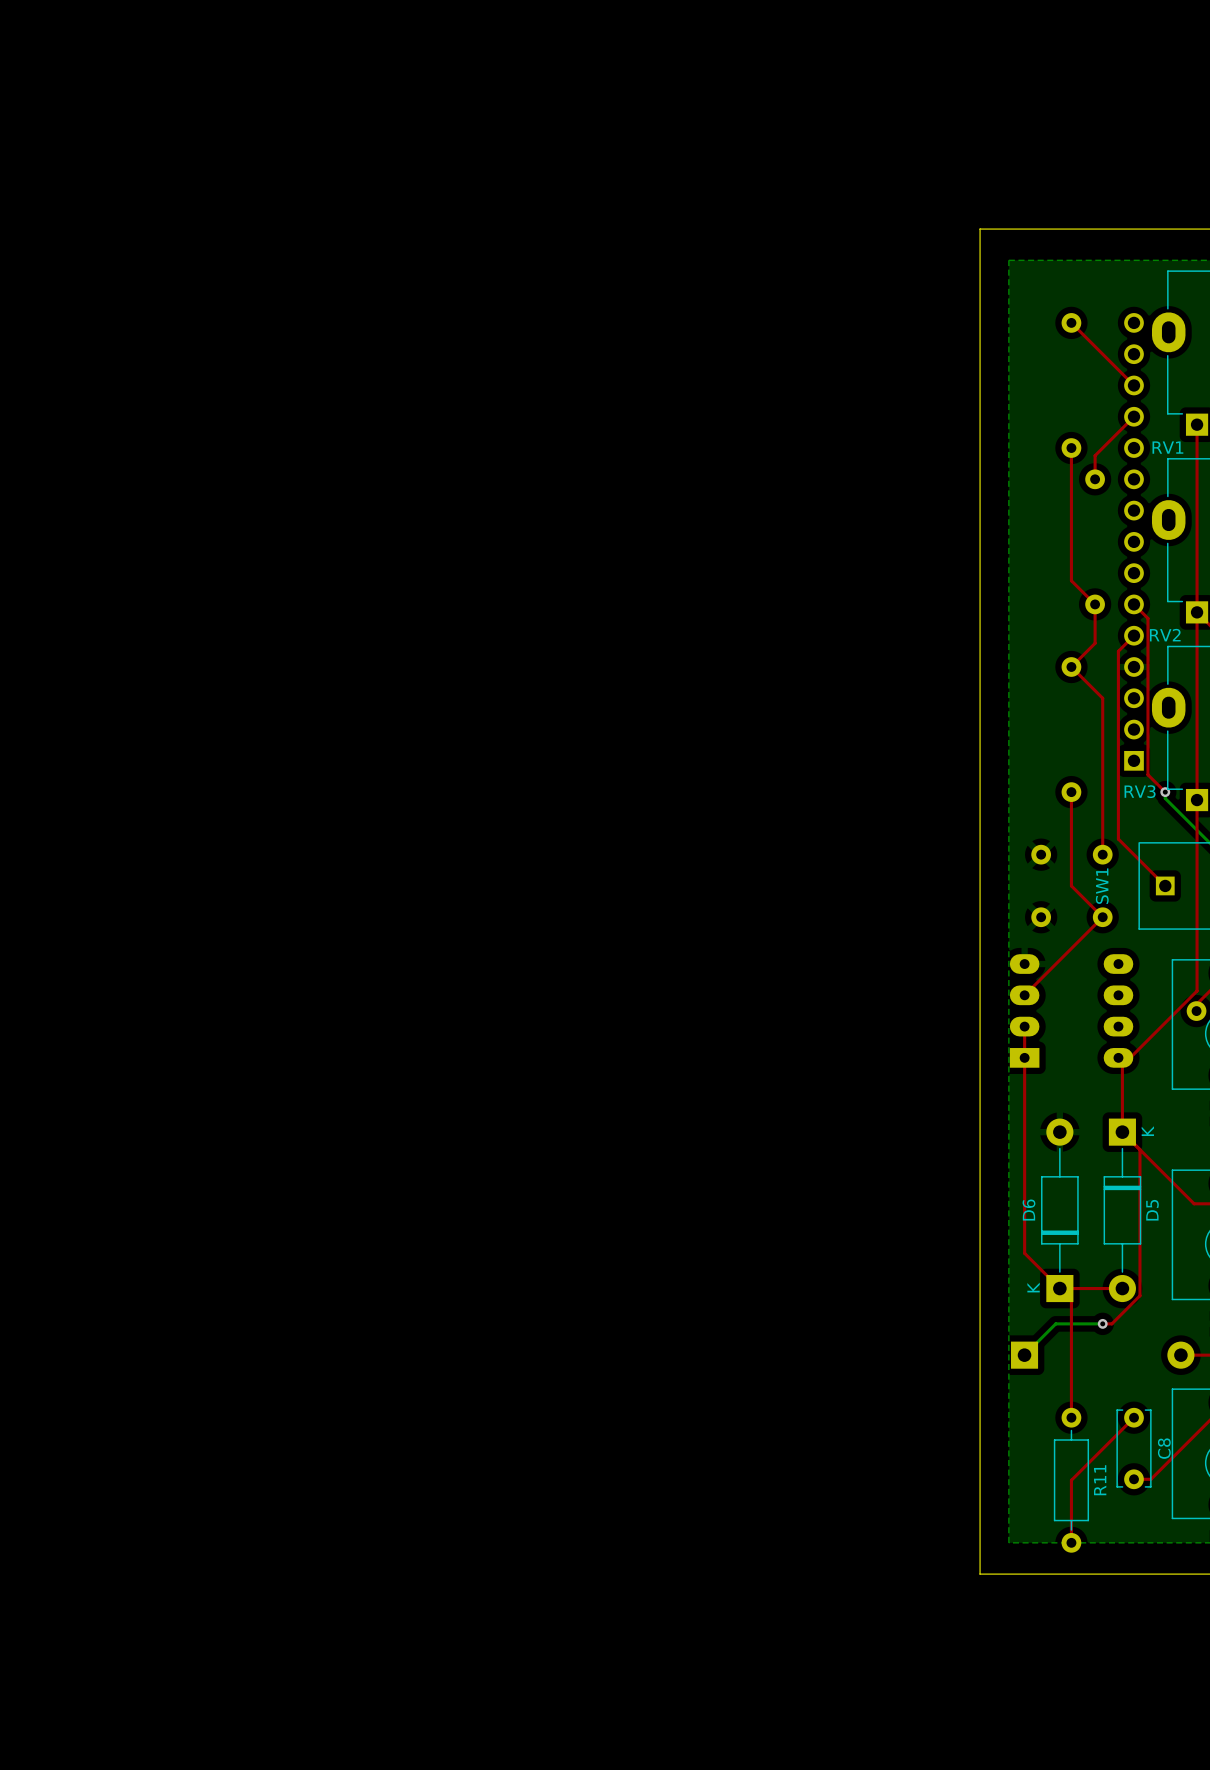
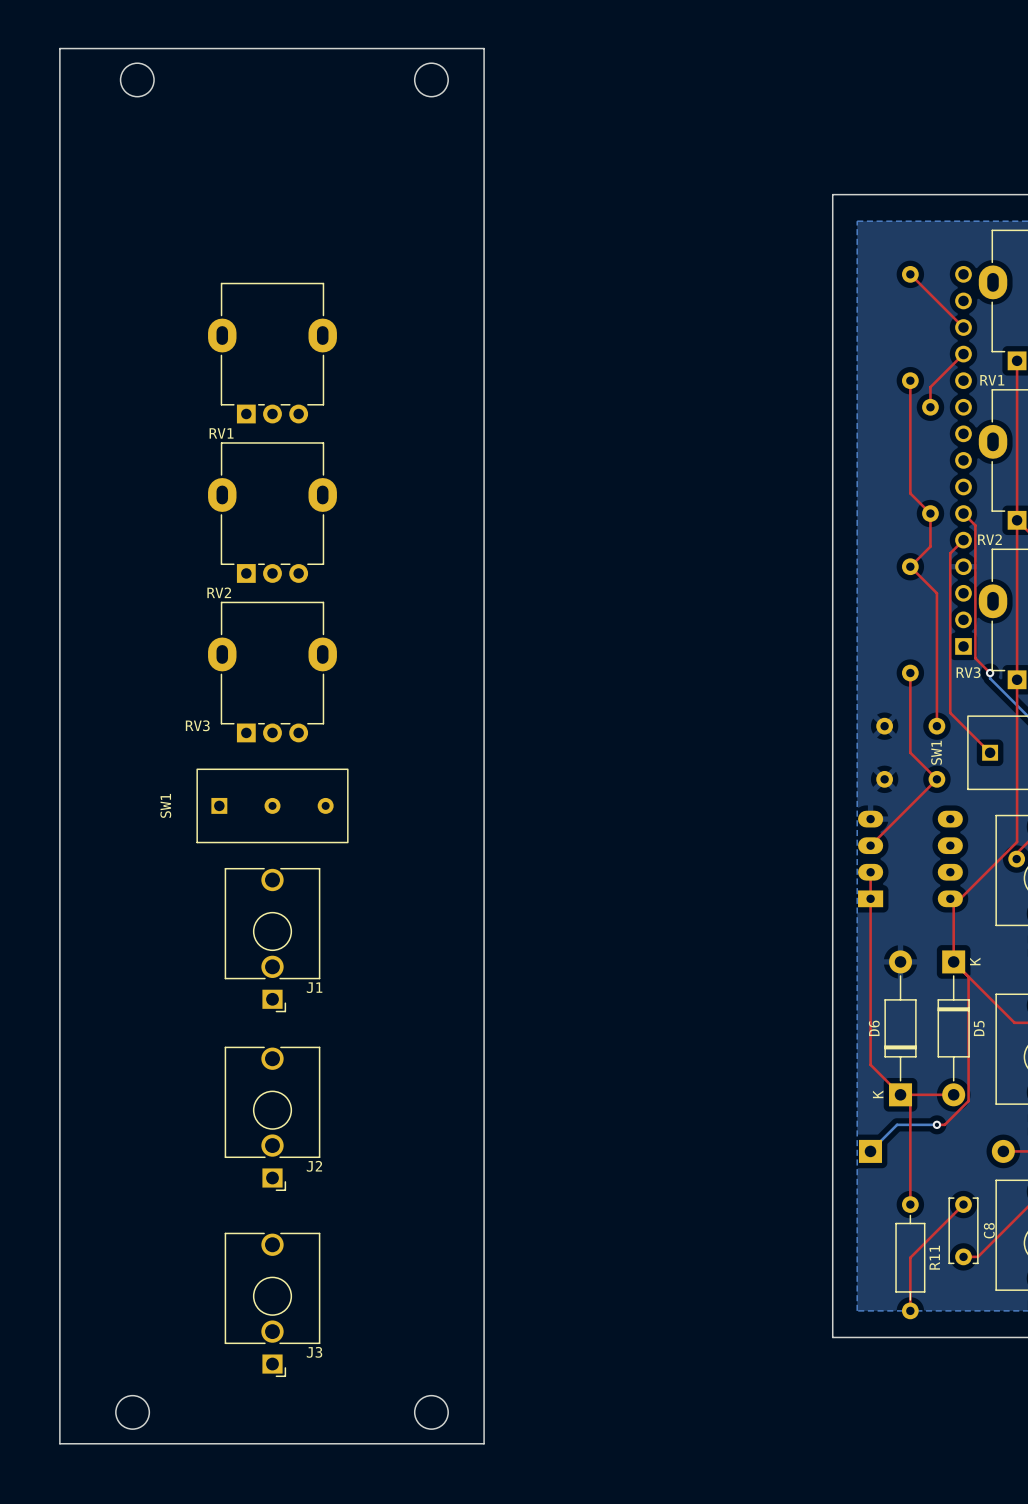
board edge: none -> (59, 48) (484, 48) (484, 1443) (59, 1443) (59, 48)
round board edge: none -> [120, 62, 155, 98]
round board edge: none -> [414, 62, 449, 98]
RV1: none -> (272, 353)
RV2: none -> (272, 512)
RV3: none -> (272, 672)
SW1: none -> (272, 805)
J1: none -> (272, 940)
J2: none -> (272, 1118)
J3: none -> (272, 1304)
round board edge: none -> [115, 1395, 150, 1430]
round board edge: none -> [414, 1395, 449, 1430]

